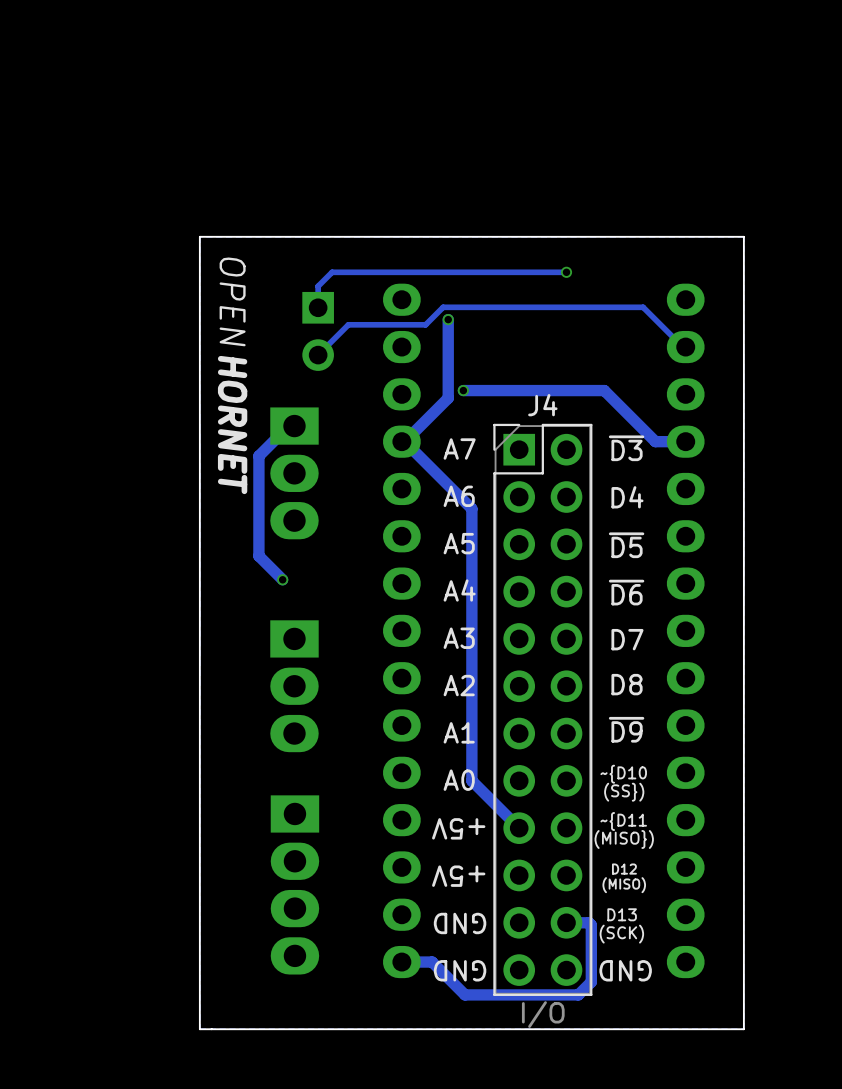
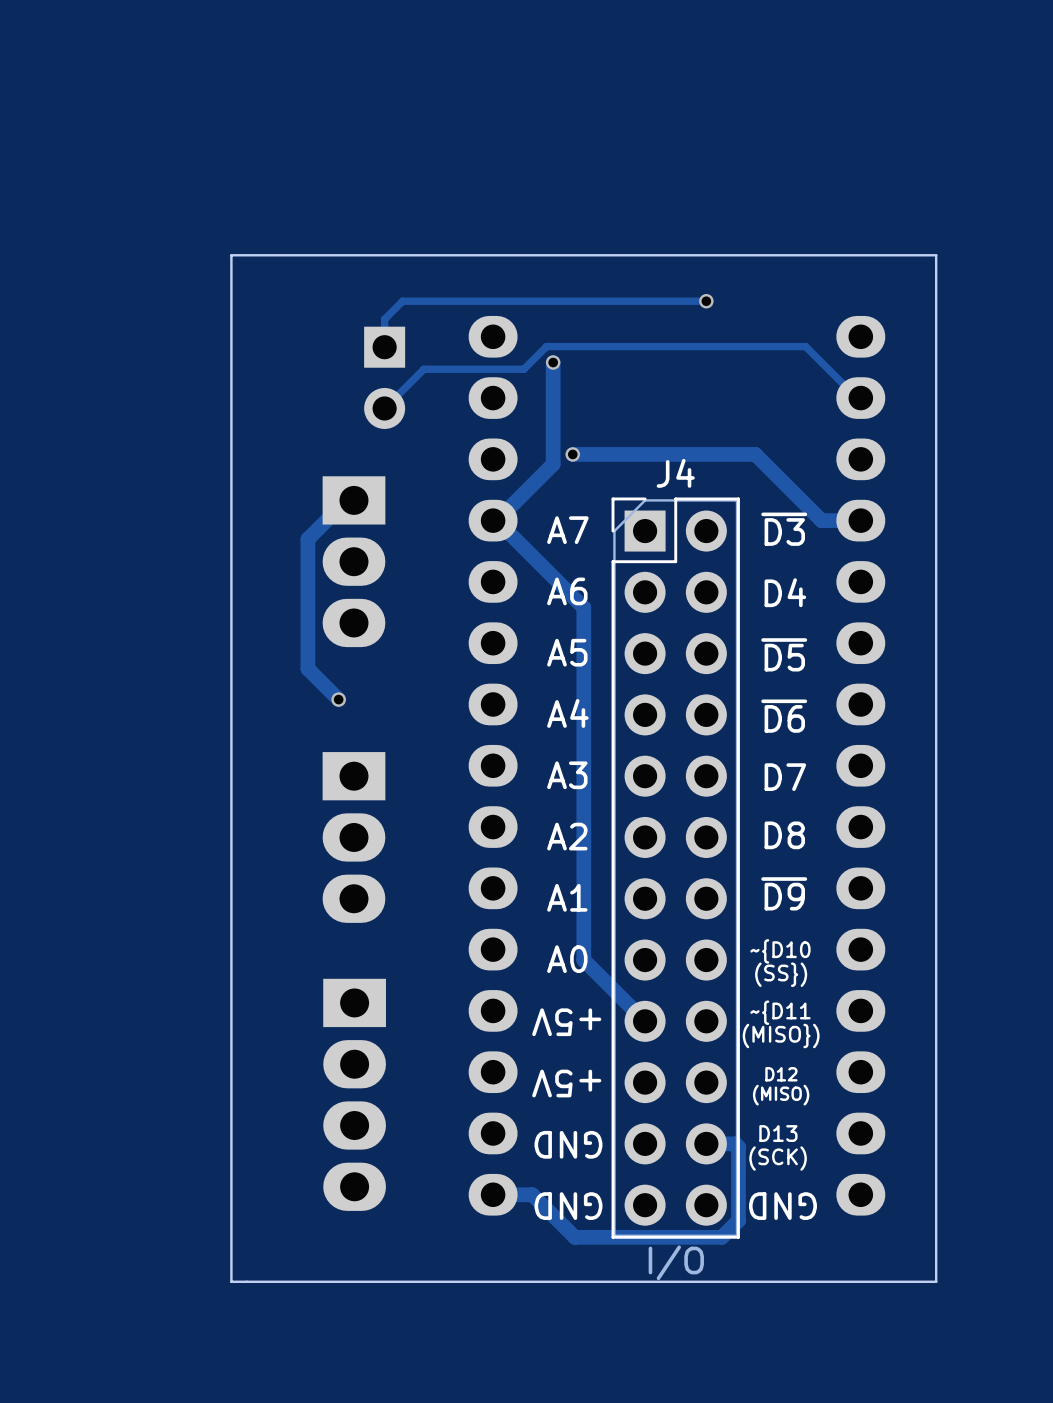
text: OPEN (232, 301) -> none
text: HORNET (232, 425) -> none

